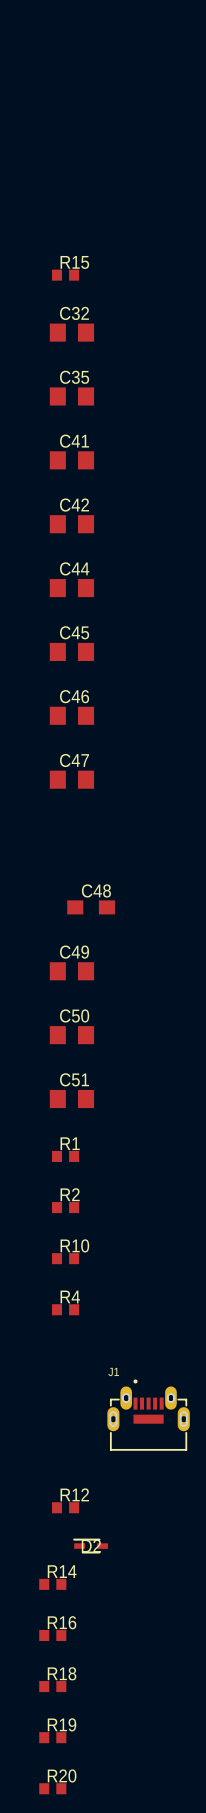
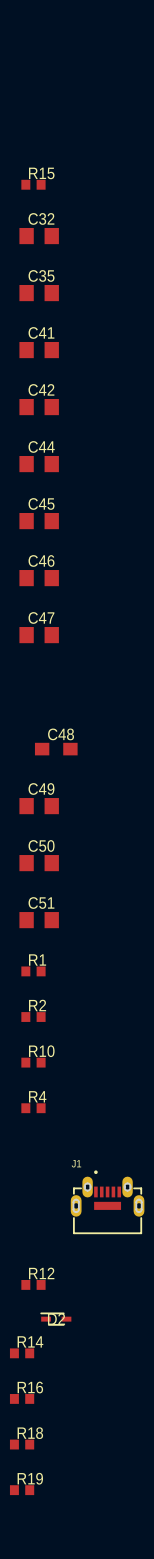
R20: (52, 1788) -> none

